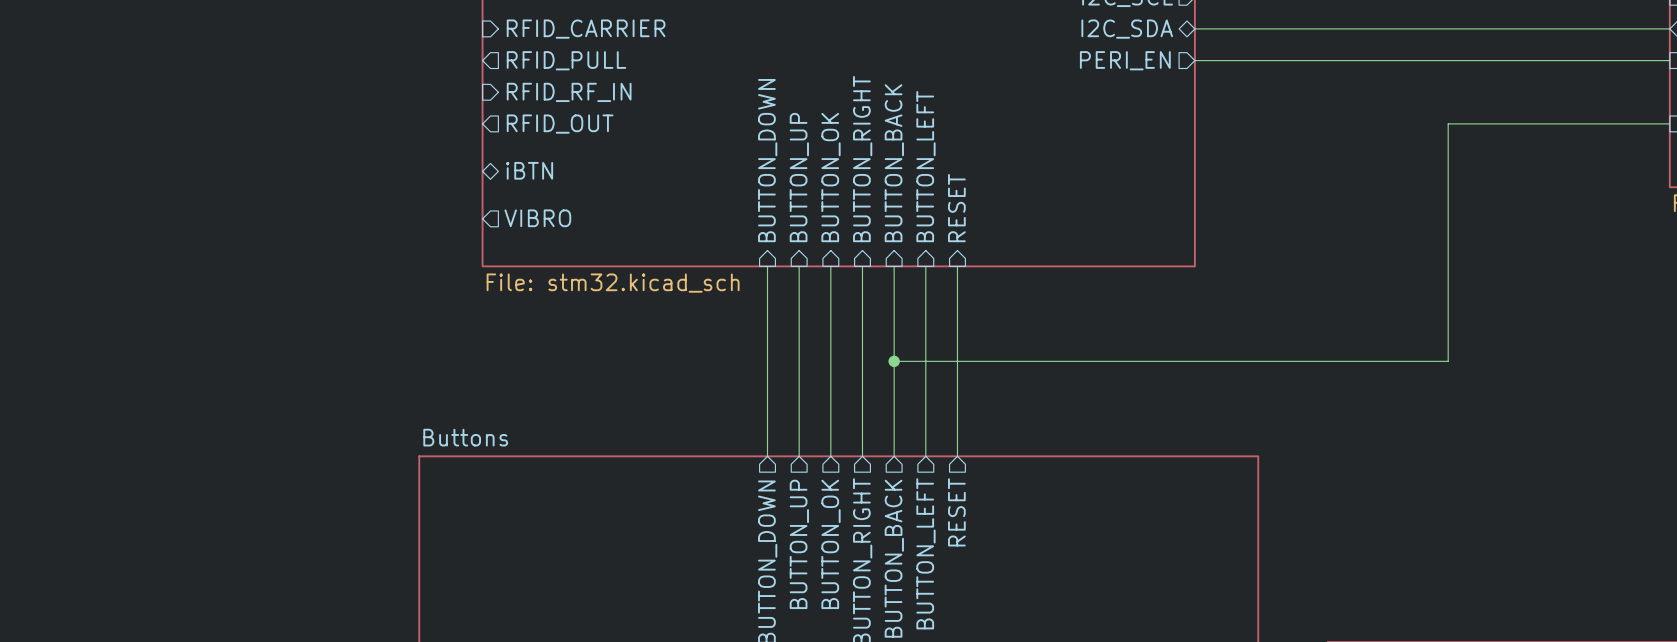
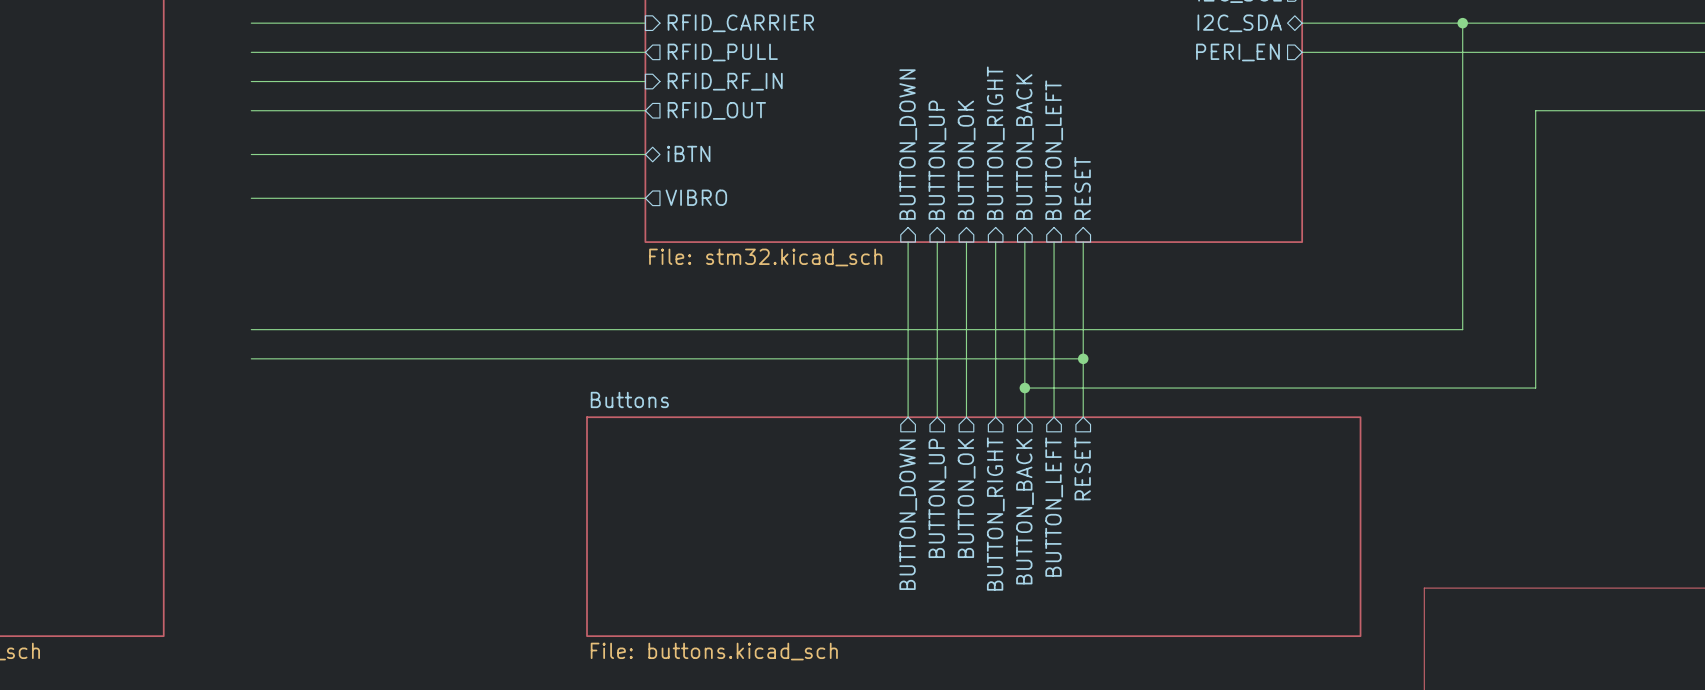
wire: none -> (251, 23) (645, 23)
junction: none -> (1462, 23)
wire: none -> (251, 52) (645, 52)
wire: none -> (251, 81) (645, 81)
wire: none -> (251, 110) (645, 110)
wire: none -> (251, 154) (645, 154)
wire: none -> (251, 198) (645, 198)
wire: none -> (251, 329) (1024, 329)
junction: (894, 361) -> none
wire: (1369, 361) (1448, 361) -> (1462, 329) (1462, 23)
wire: none -> (1535, 329) (1535, 388) (1024, 388)
wire: none -> (251, 358) (1083, 358)
junction: none -> (1083, 358)
junction: none -> (1024, 388)

